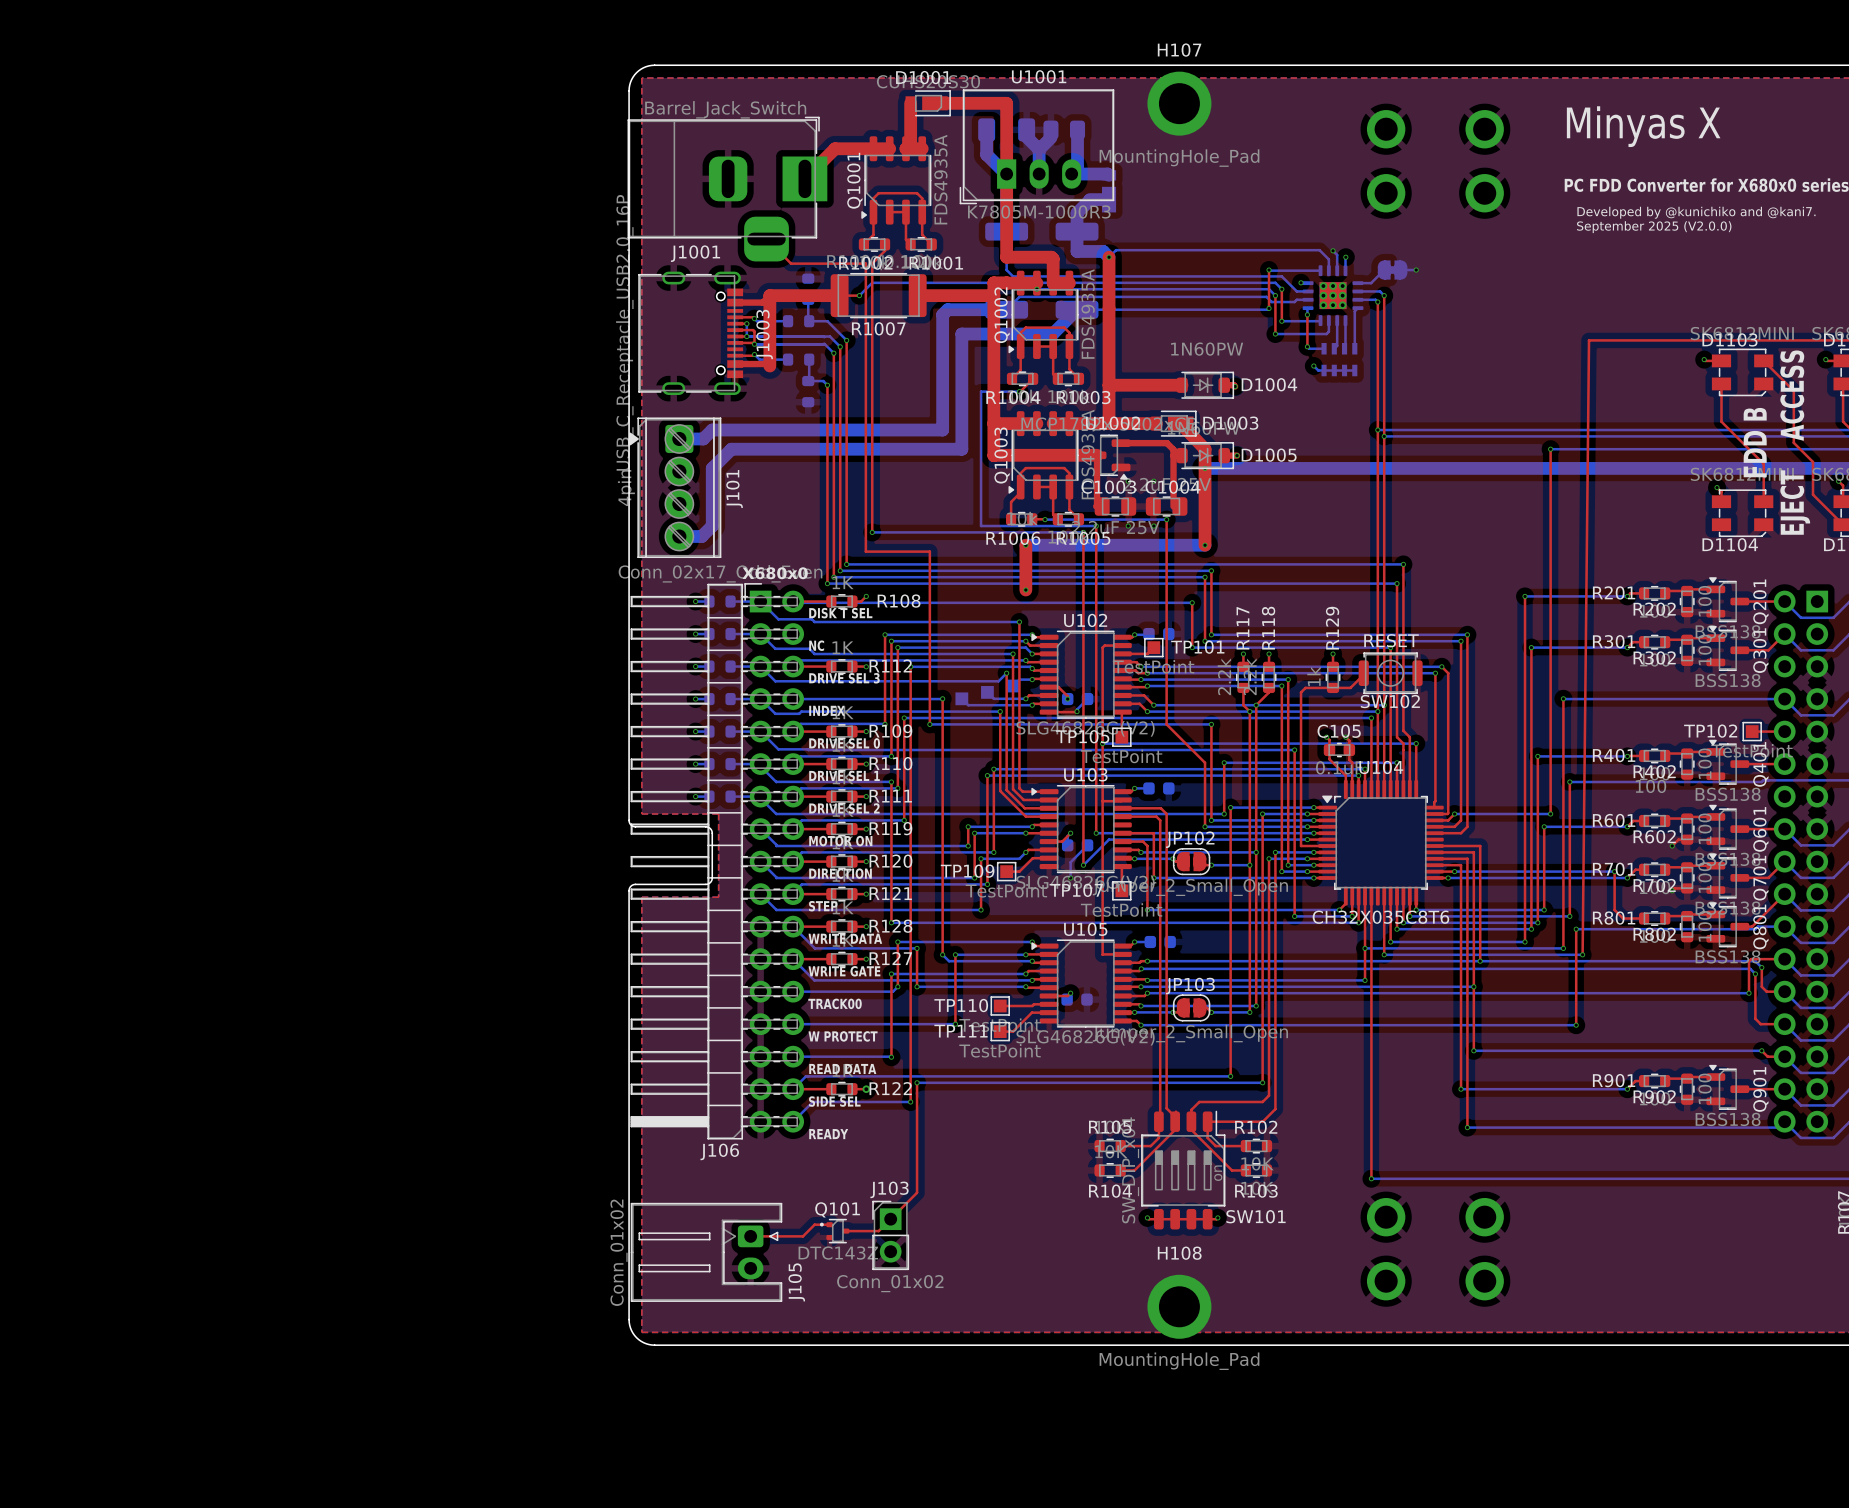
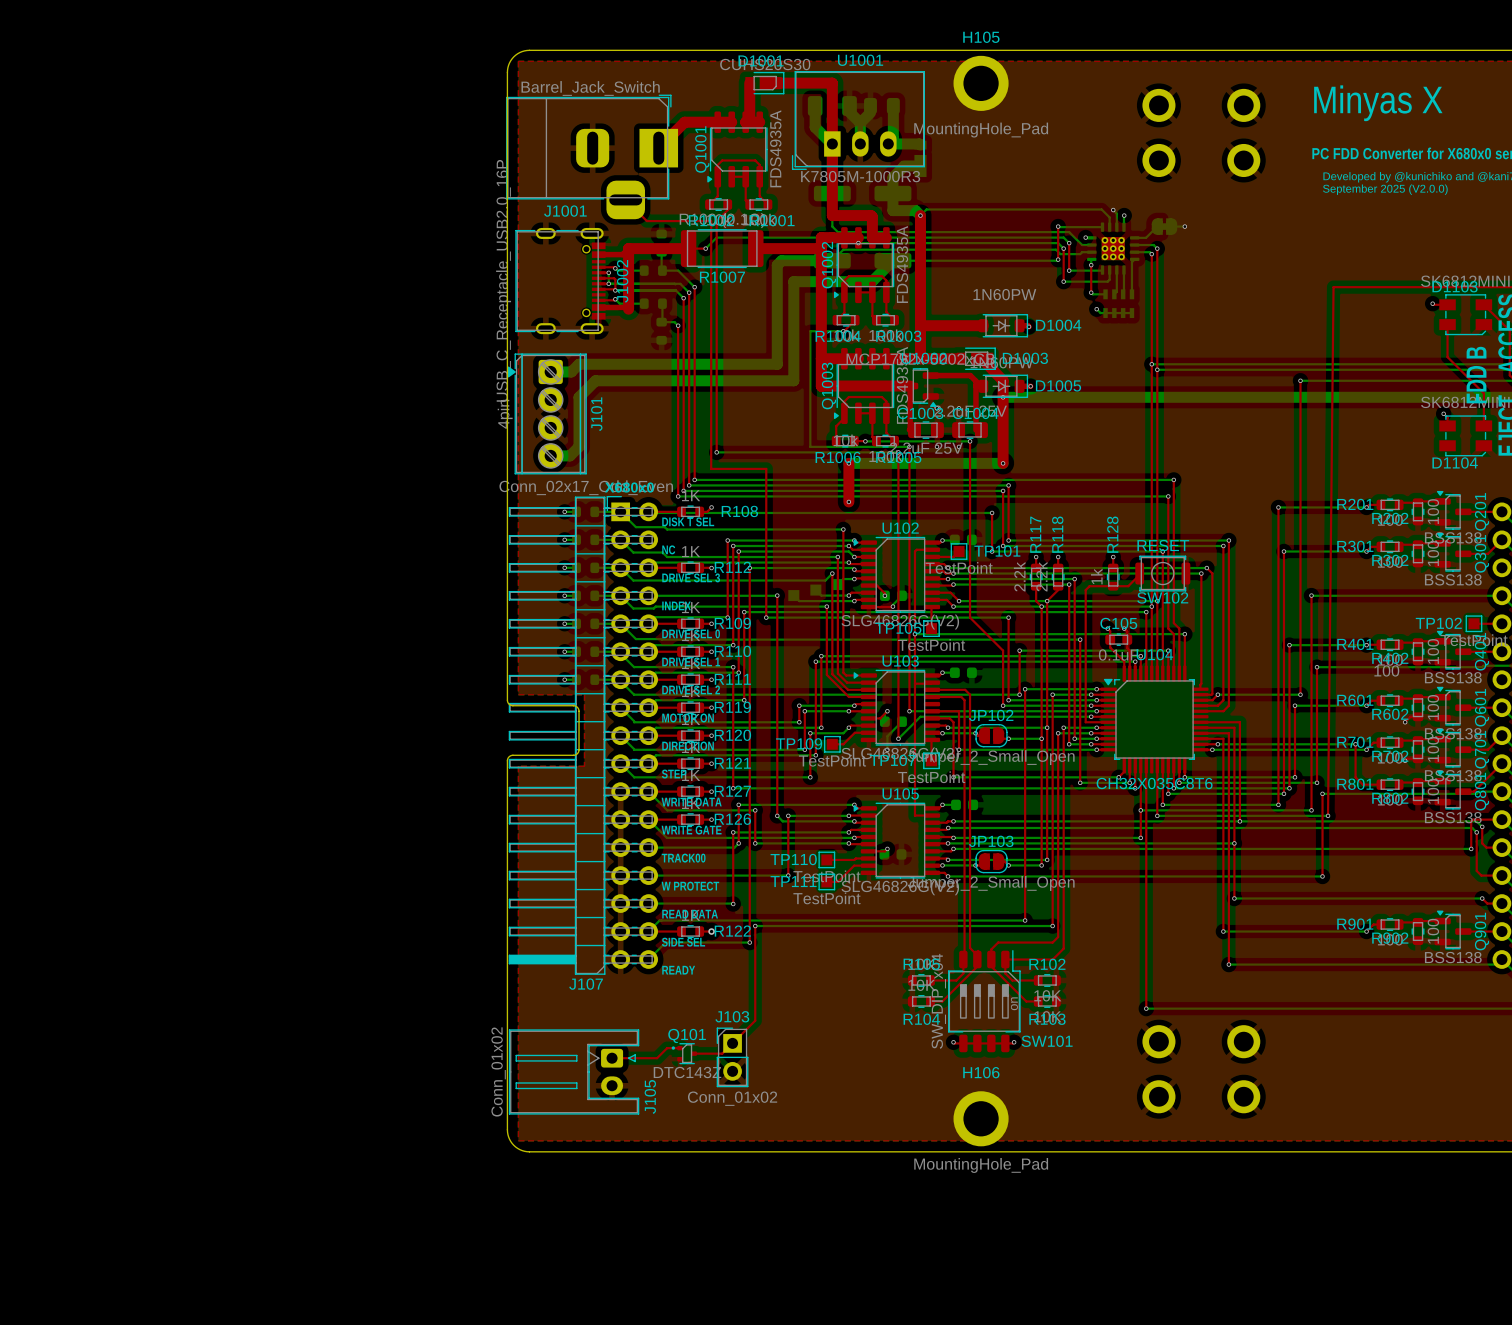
H107 name: H107 (1179, 50) -> H105 (981, 37)
J1003 name: J1003 (764, 334) -> J1002 (622, 281)
R129 name: R129 (1332, 628) -> R128 (1112, 534)
R128 name: R128 (890, 926) -> R127 (732, 791)
R127 name: R127 (890, 958) -> R126 (732, 819)
J106 name: J106 (719, 1151) -> J107 (586, 984)
H108 name: H108 (1179, 1253) -> H106 (981, 1072)

